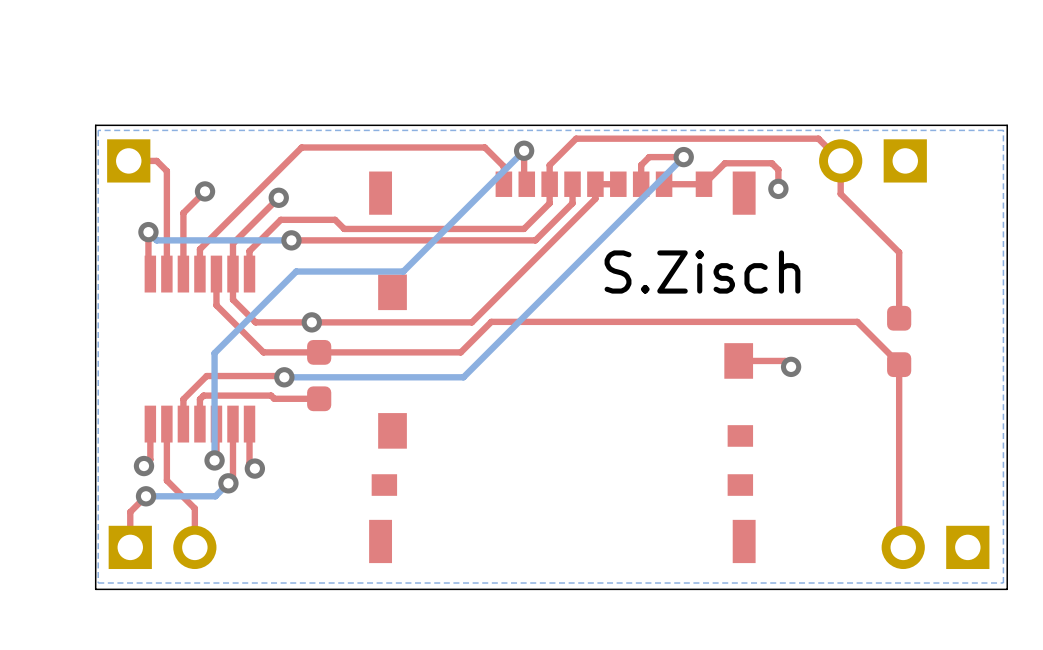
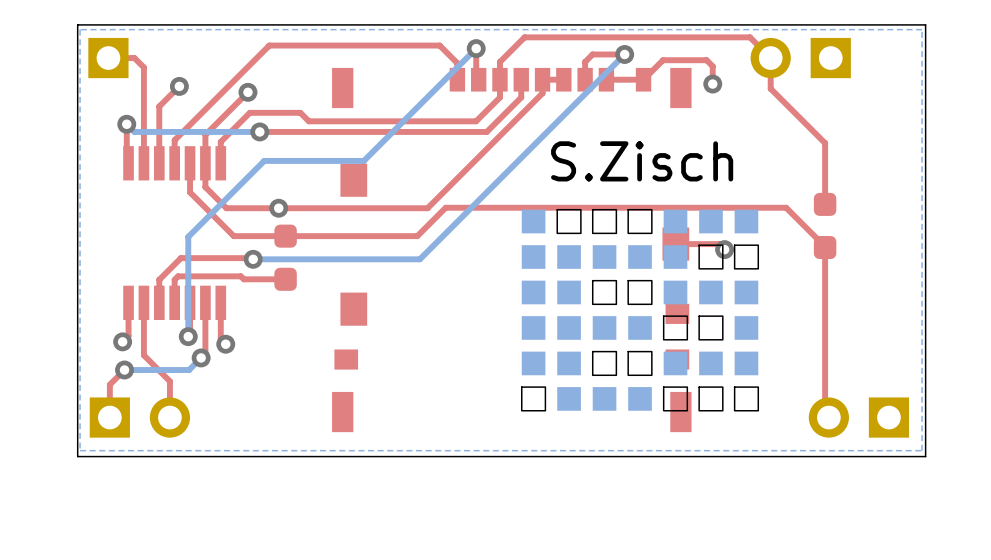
part: none -> (640, 310)

